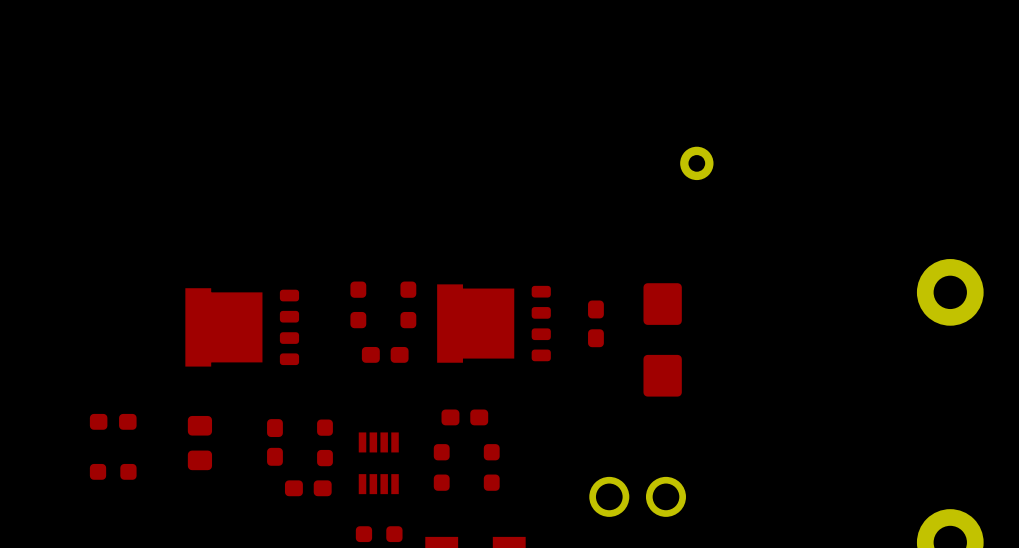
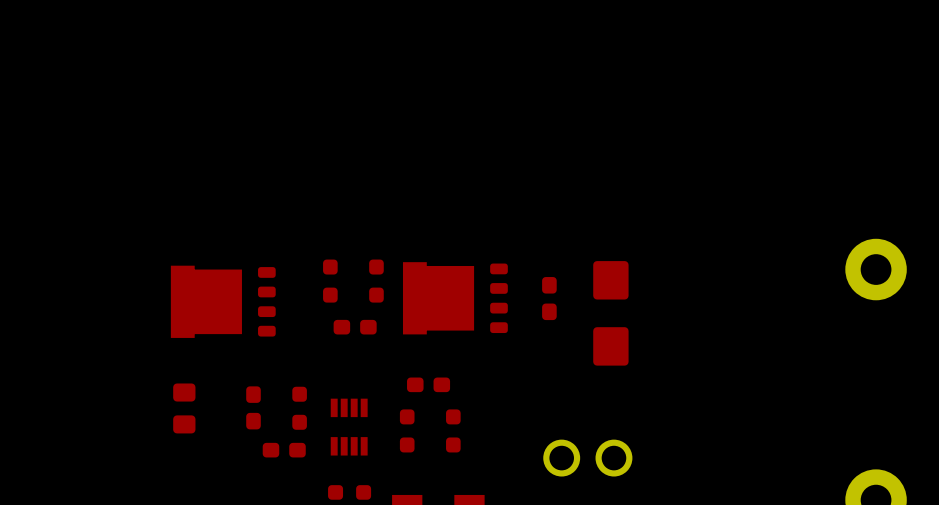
part: (696, 163) -> none
part: (113, 421) -> none
part: (113, 471) -> none

